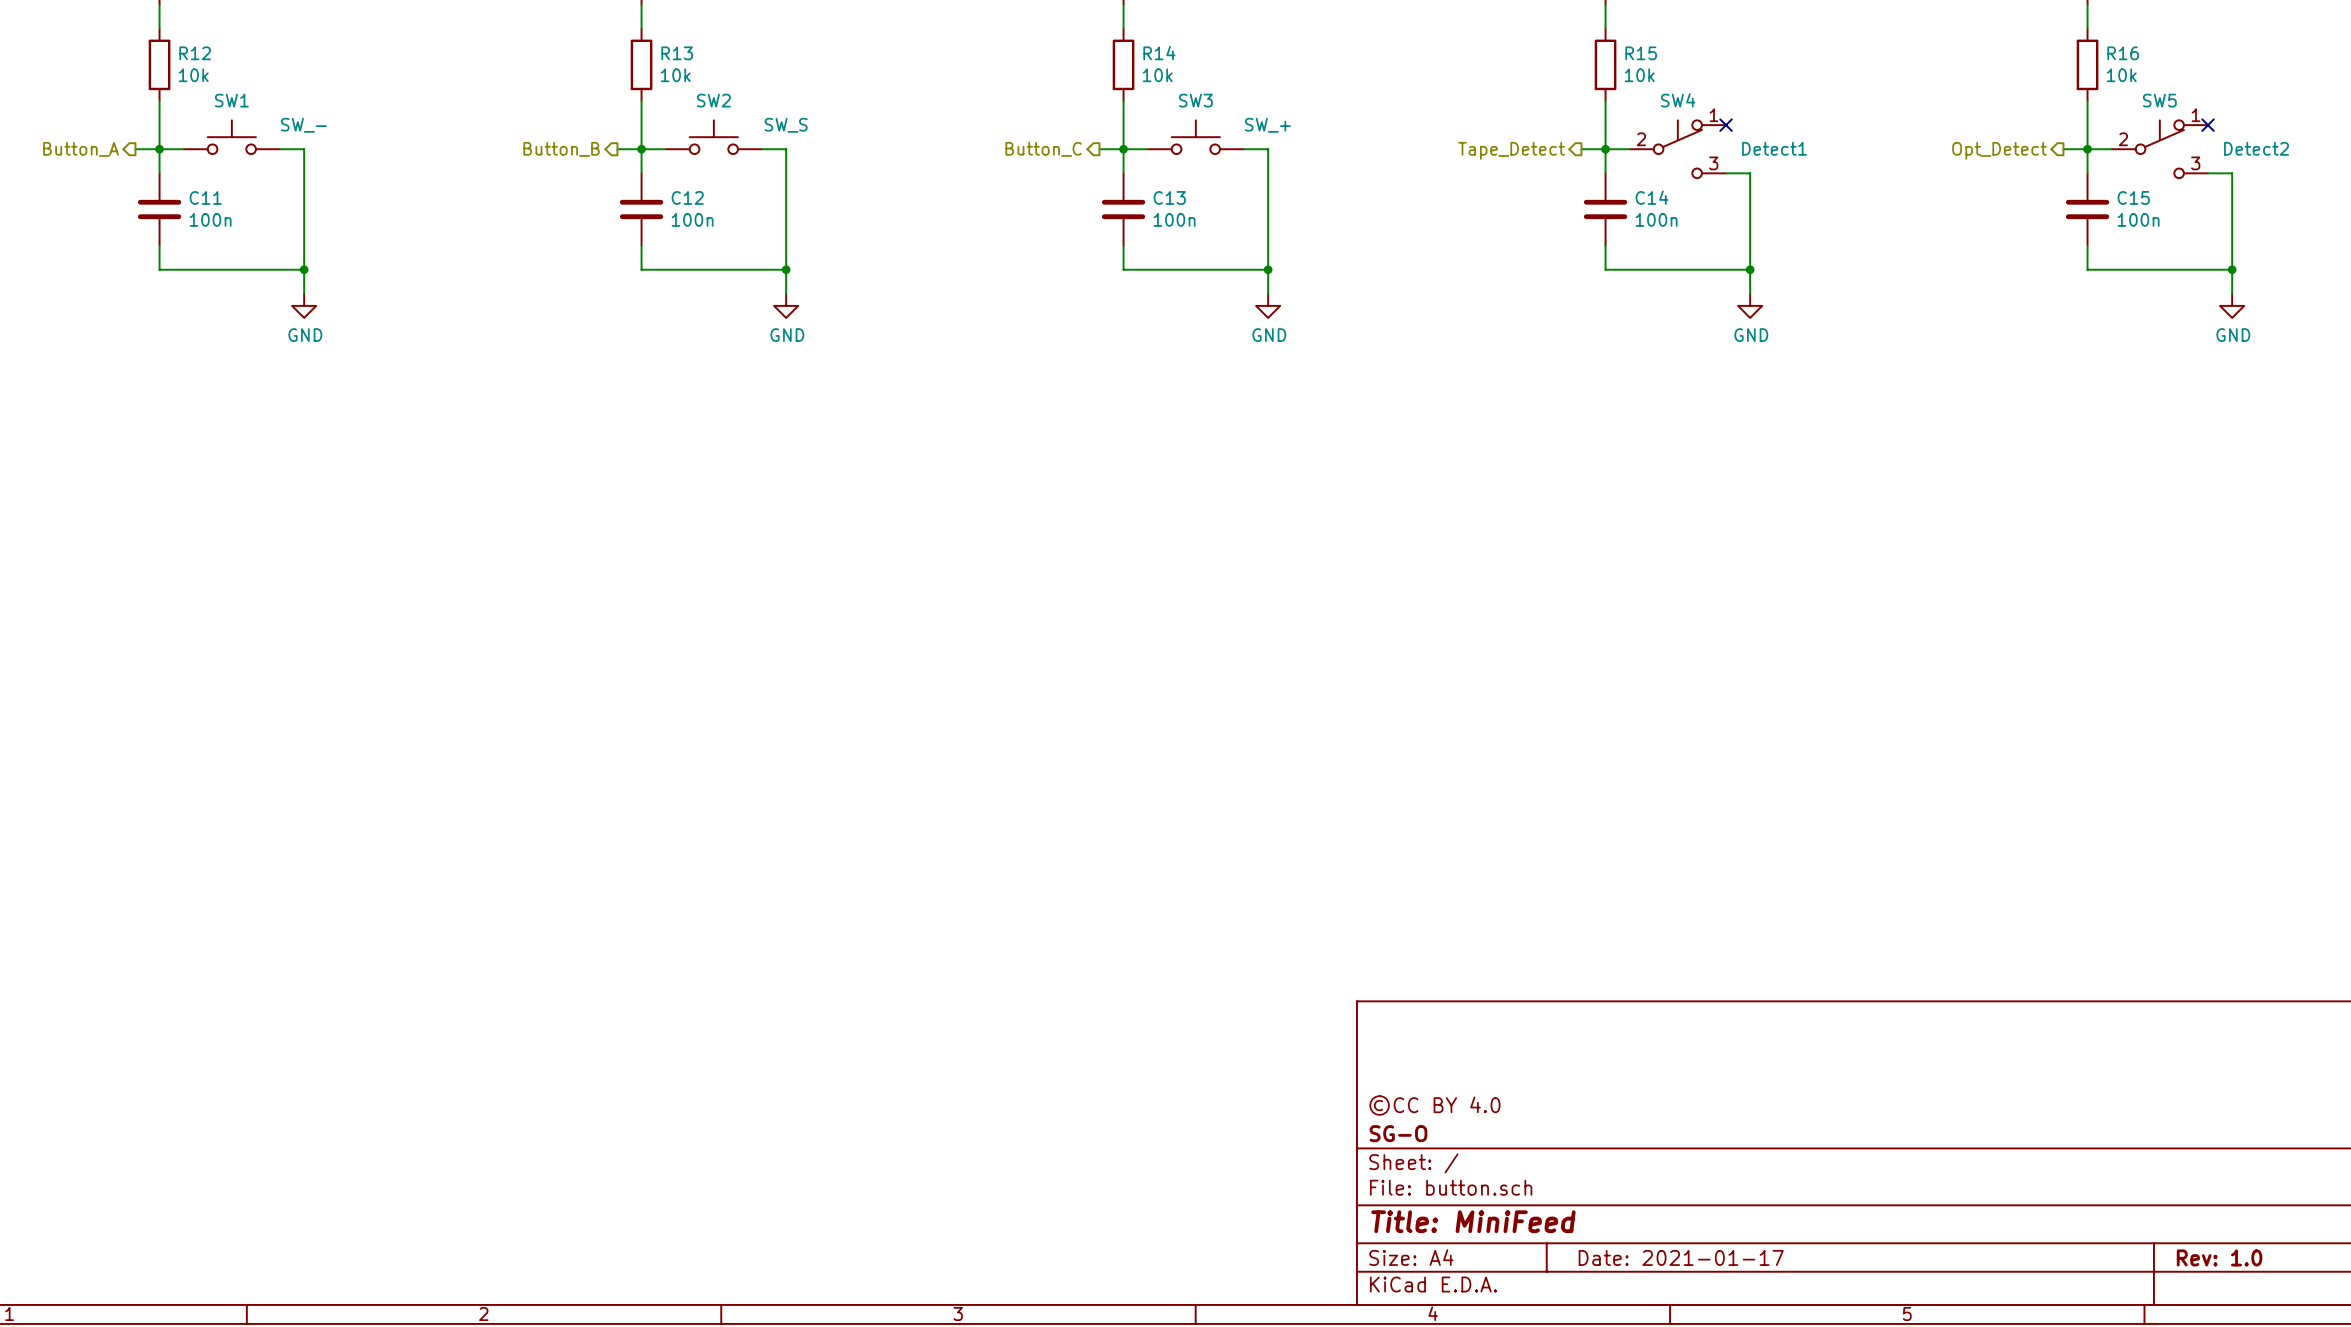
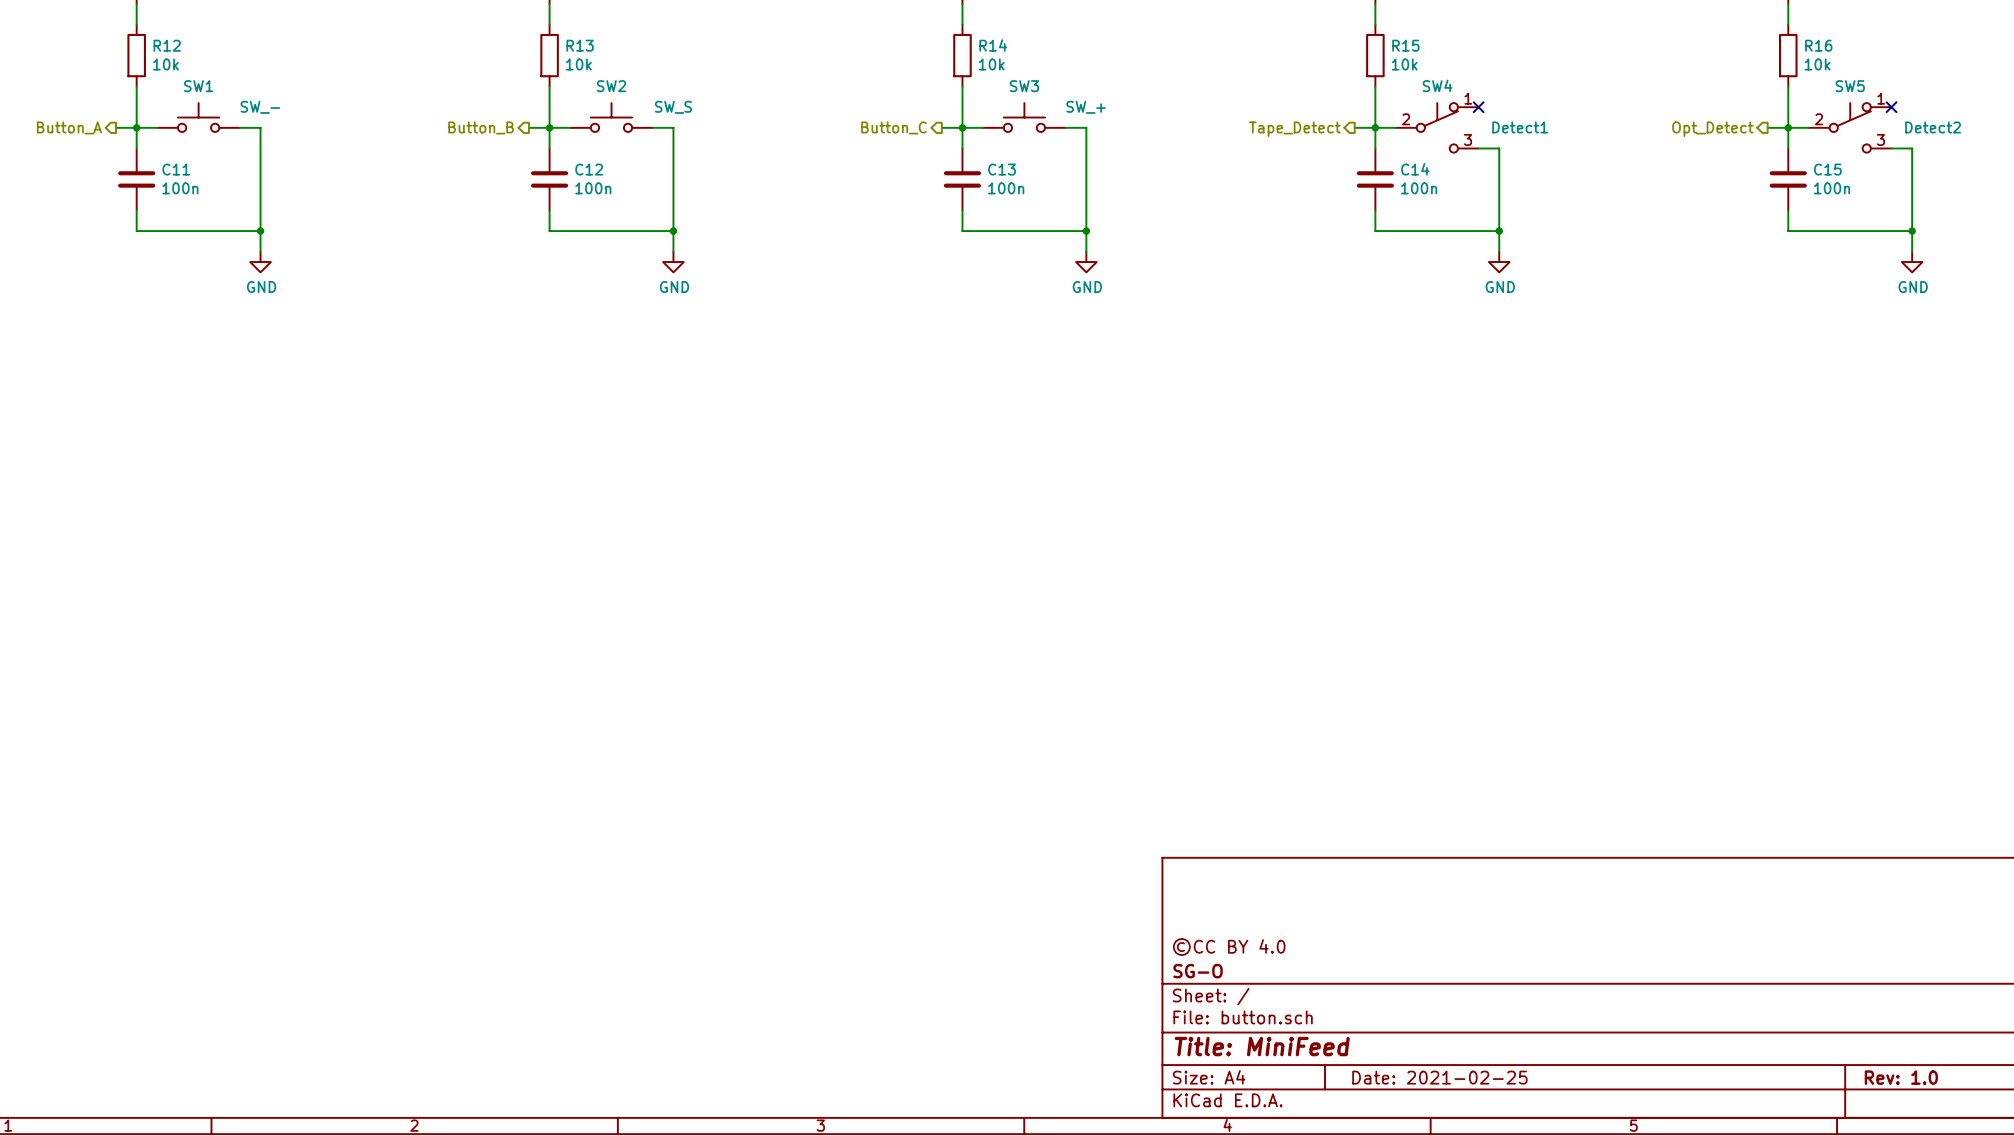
title block: Date: 2021-01-17 (1681, 1257) -> Date: 2021-02-25 (1439, 1077)

